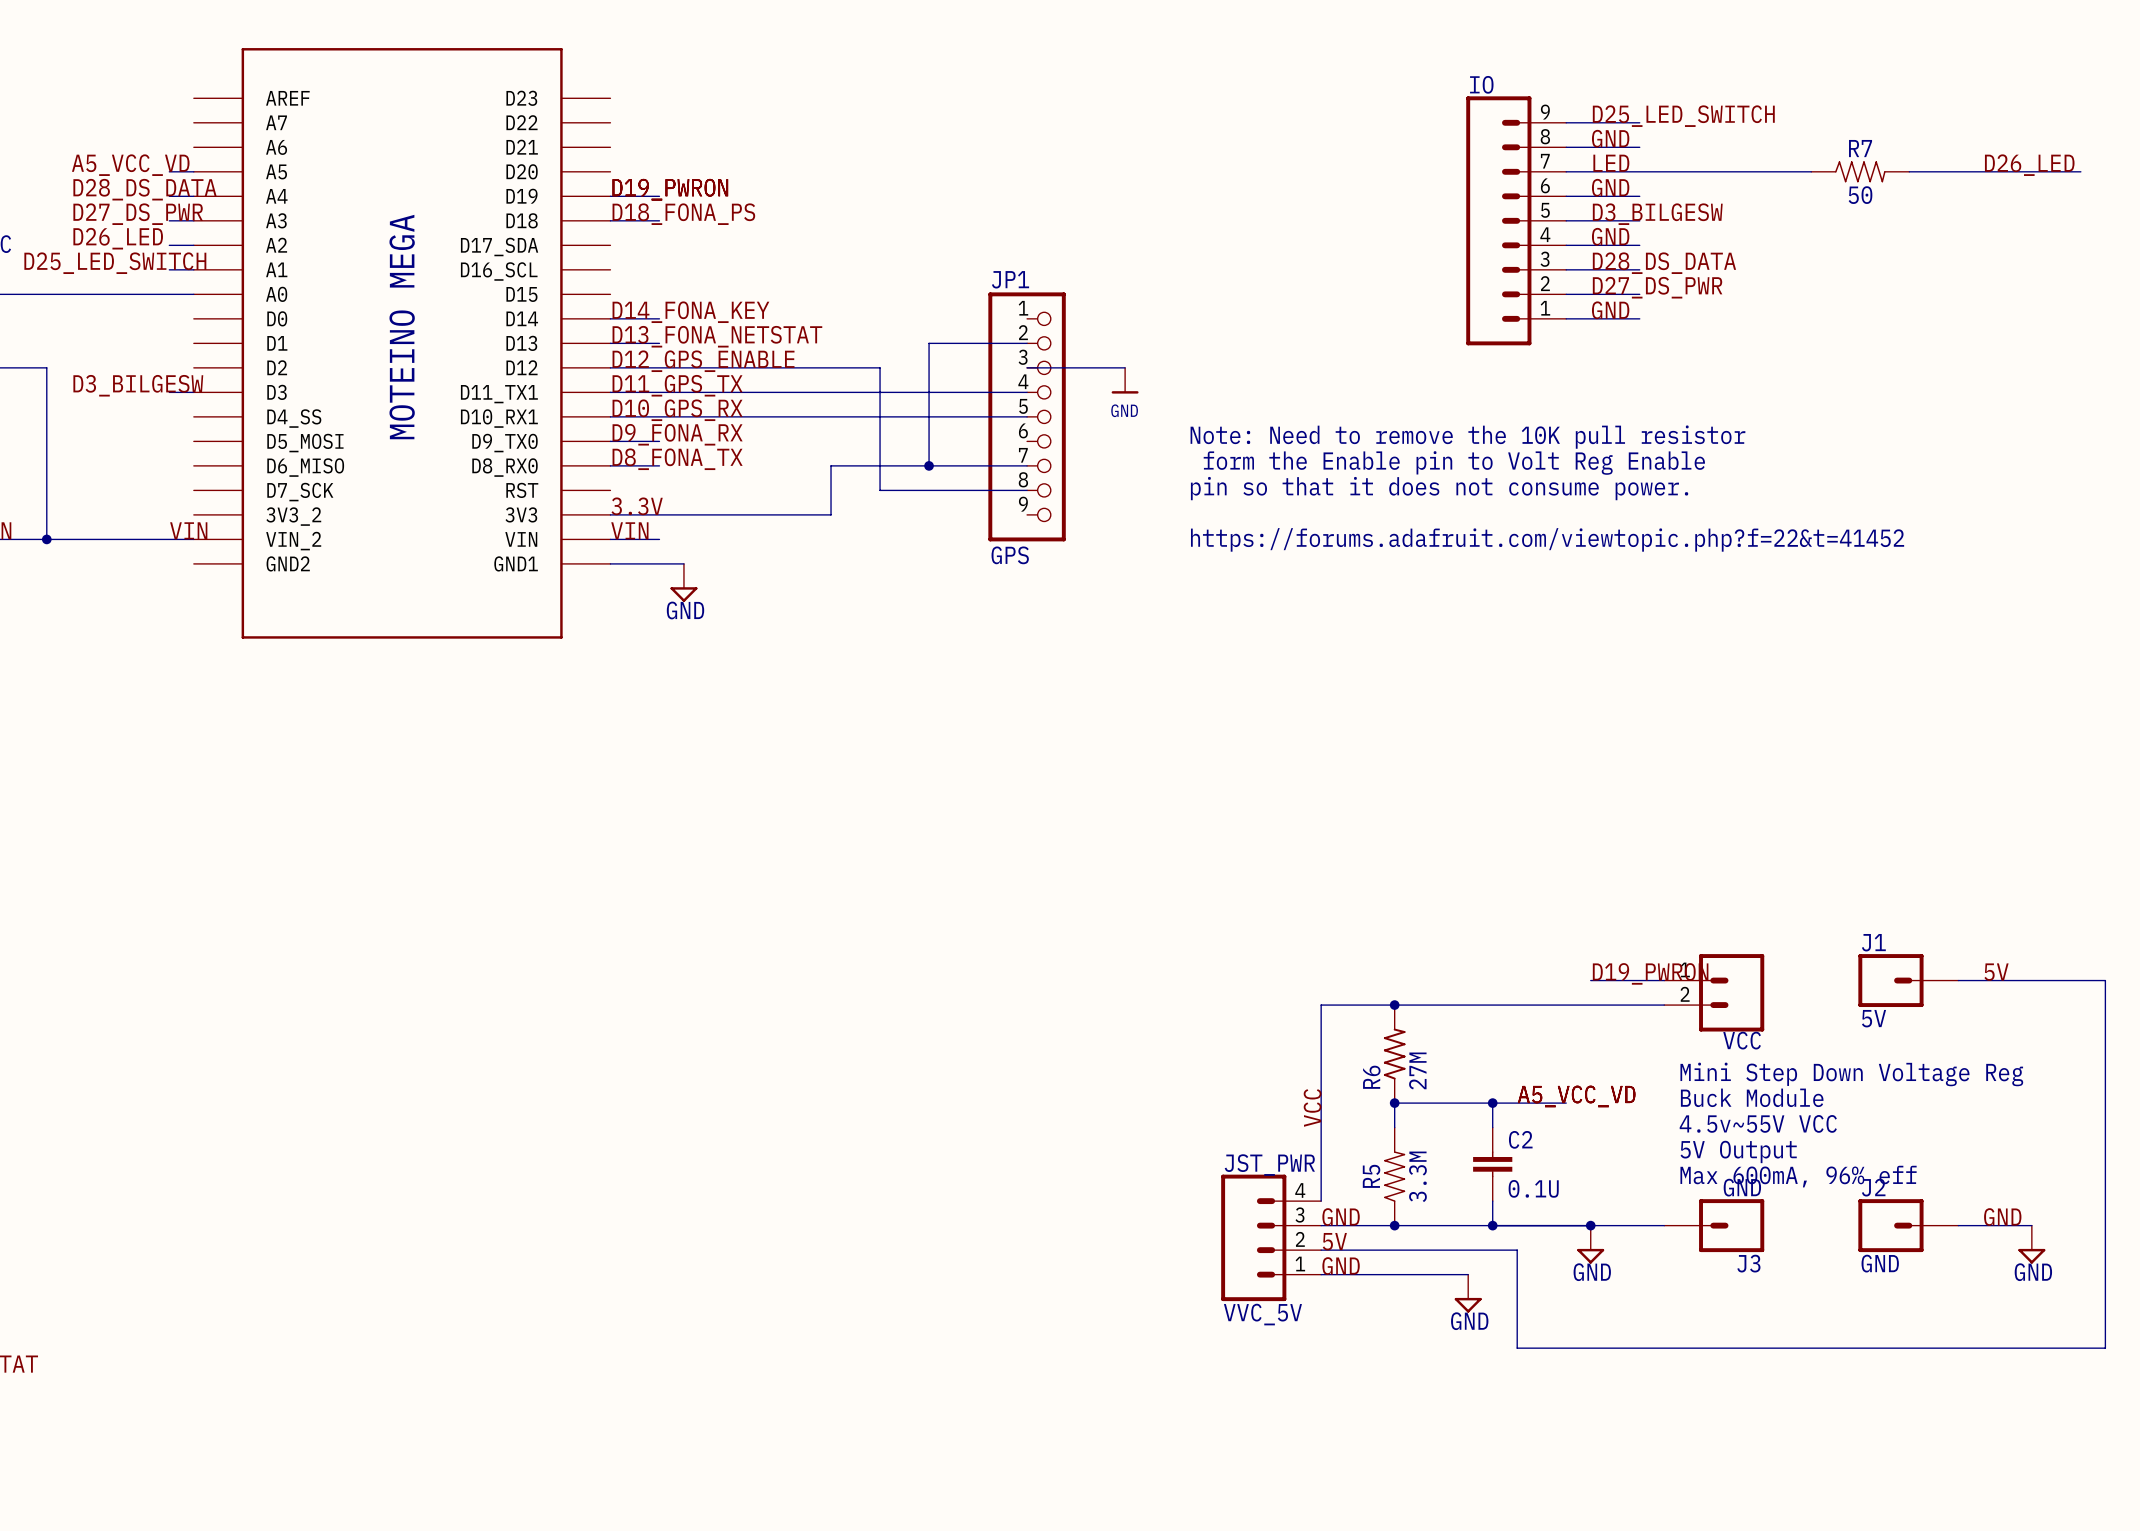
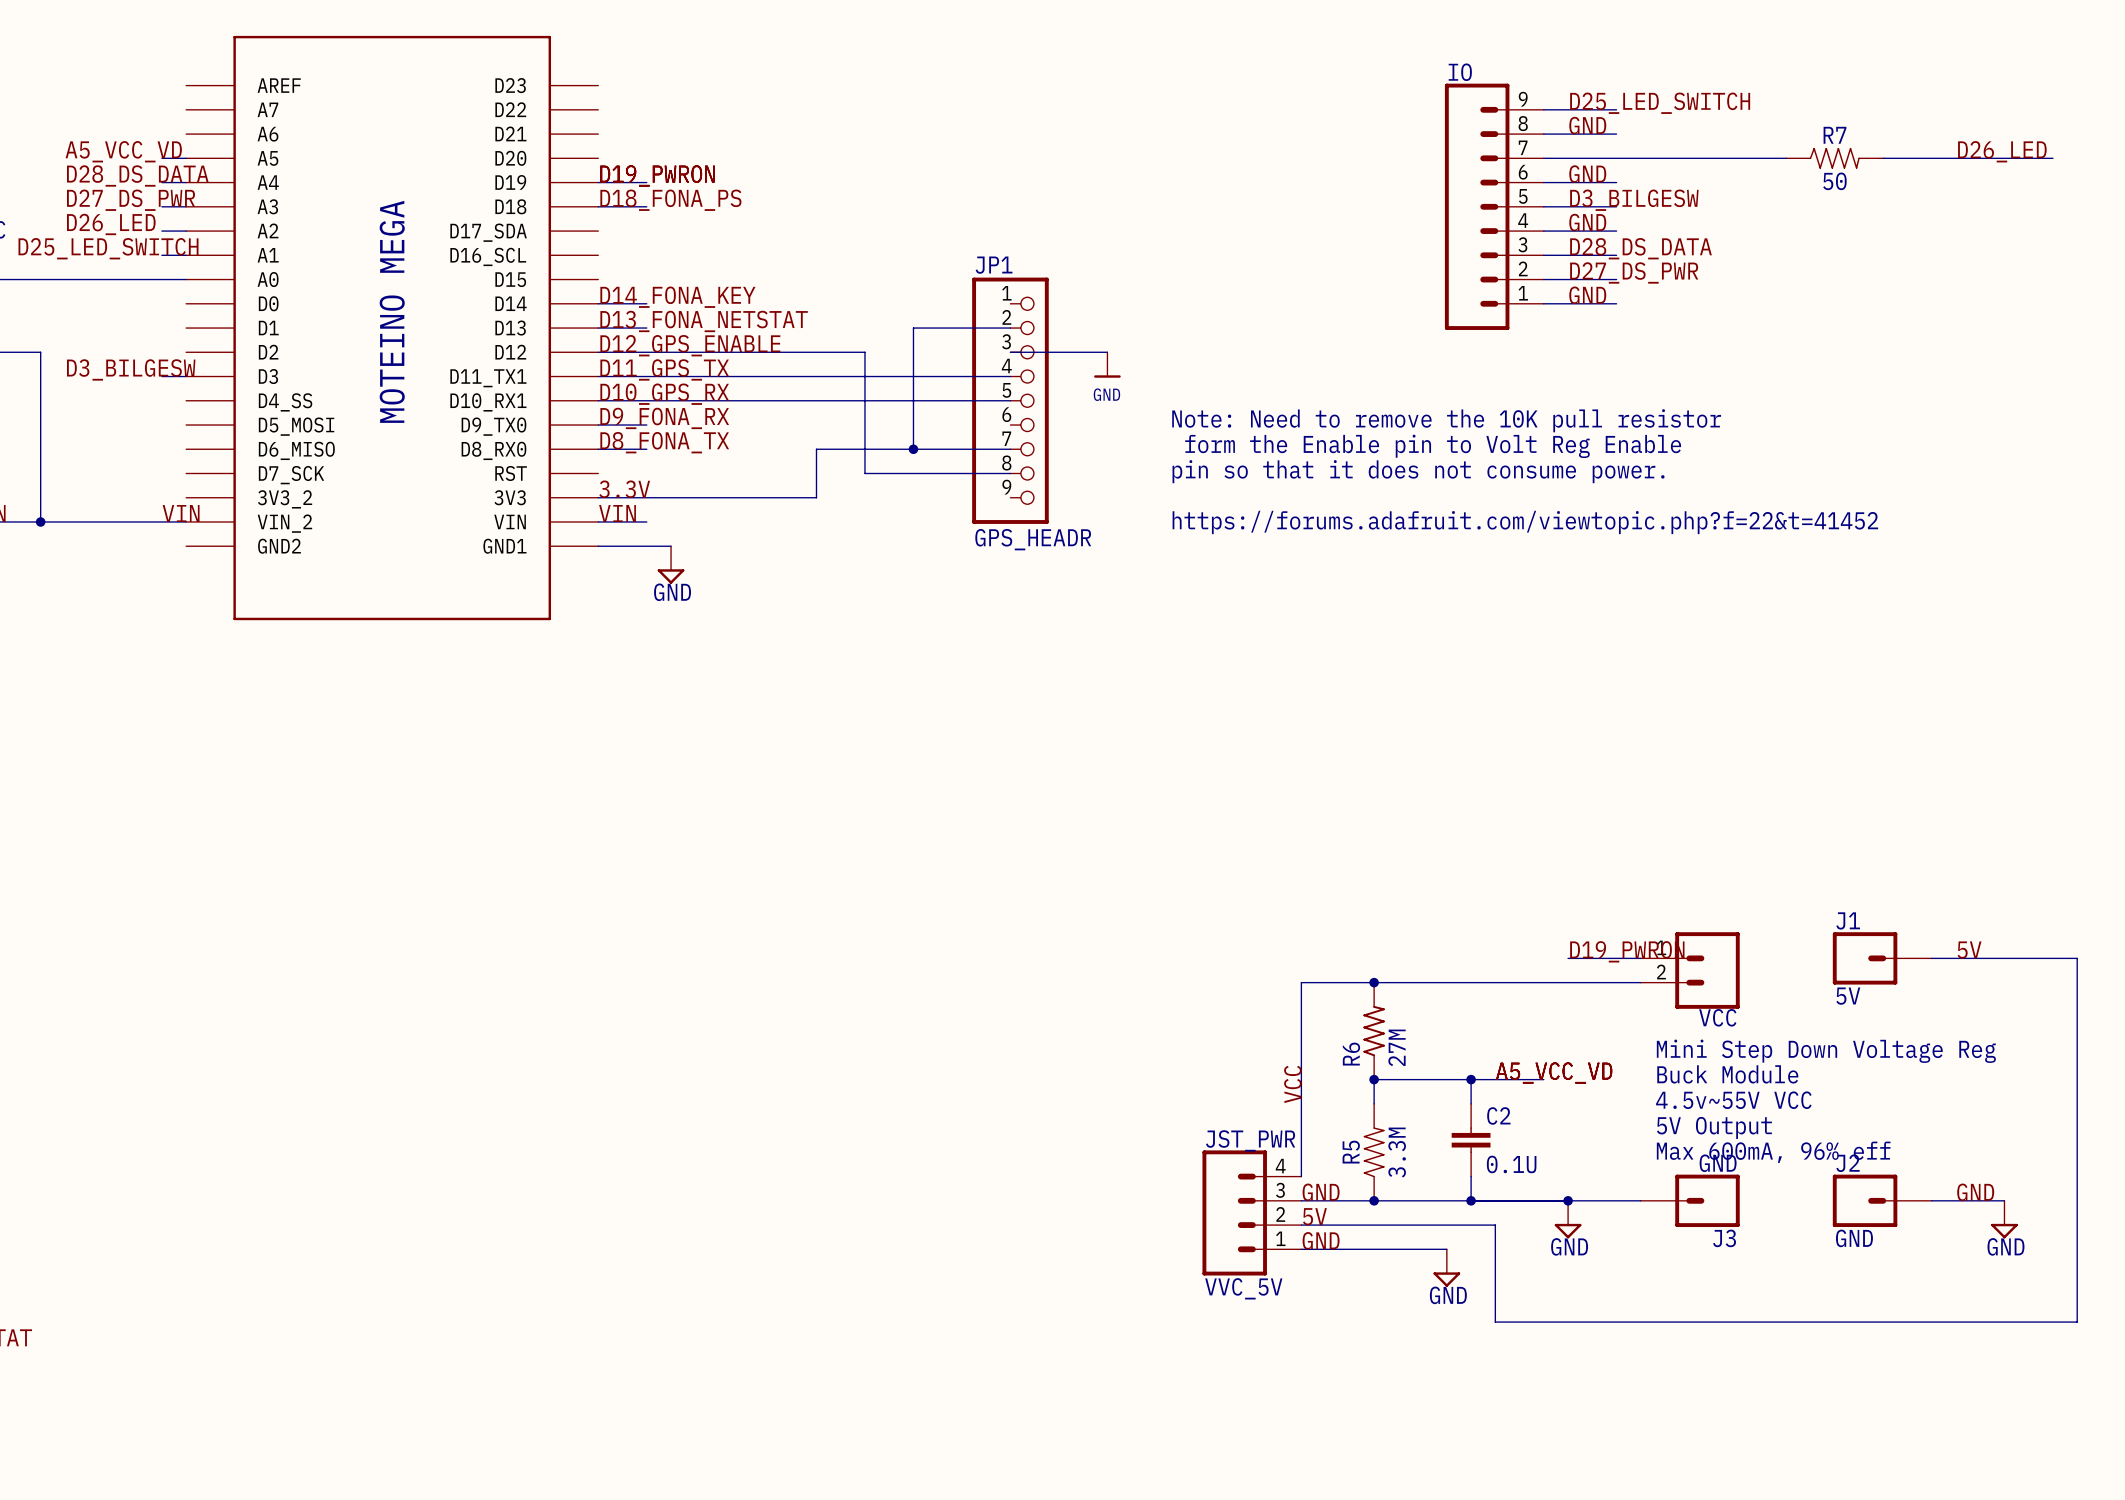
label: LED (1611, 163) -> none
JP1 value: GPS (1010, 555) -> GPS_HEADR (1033, 539)

